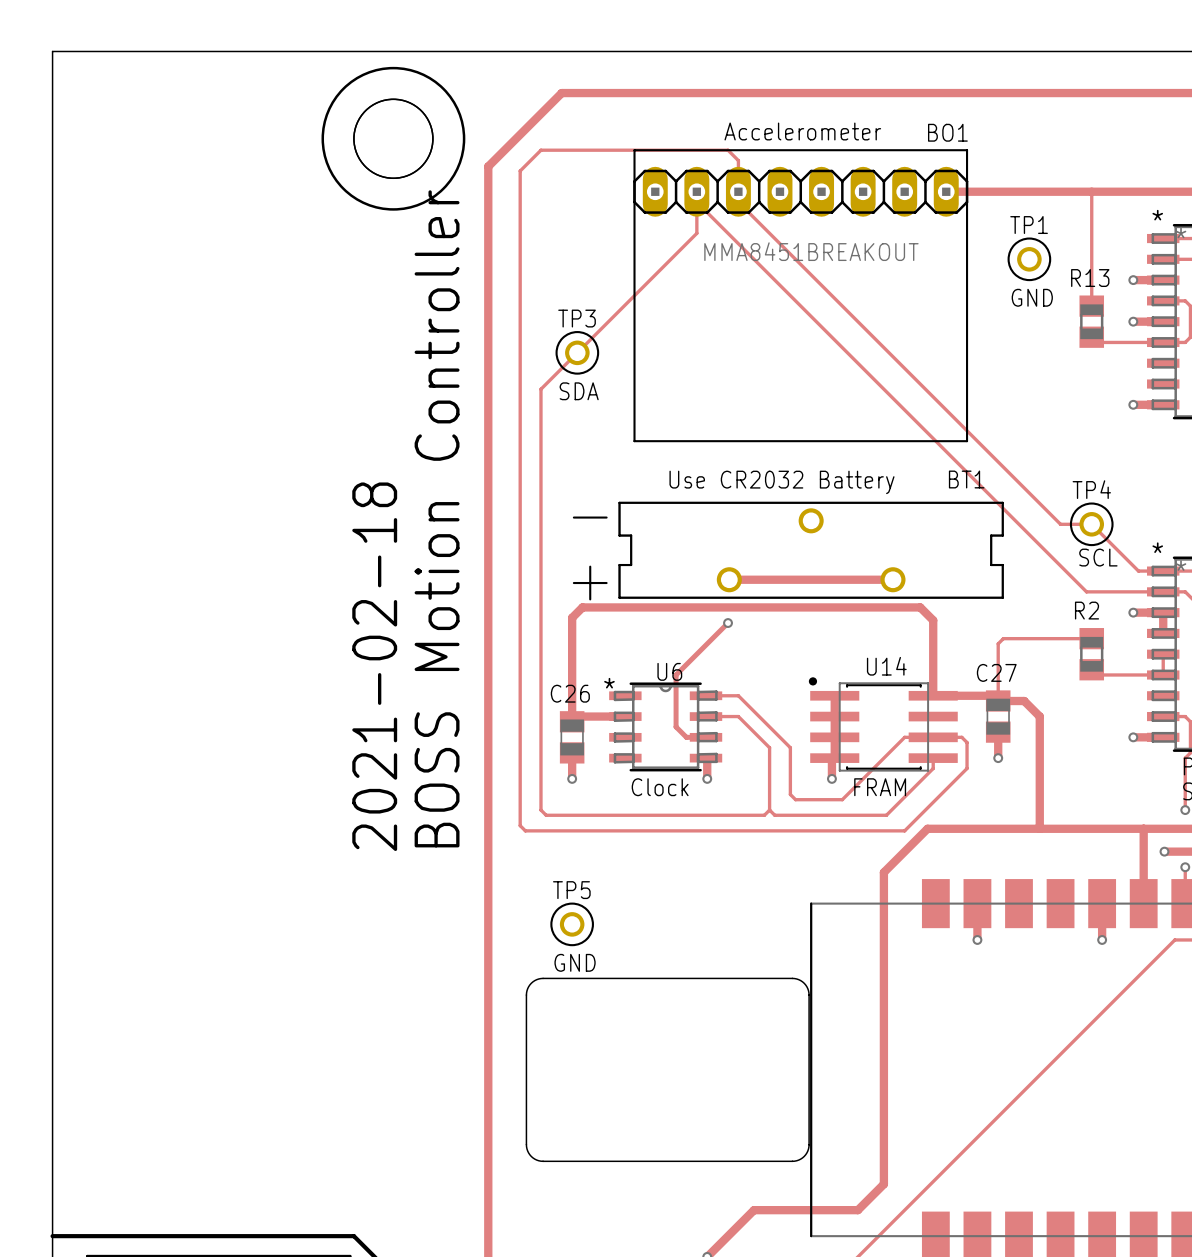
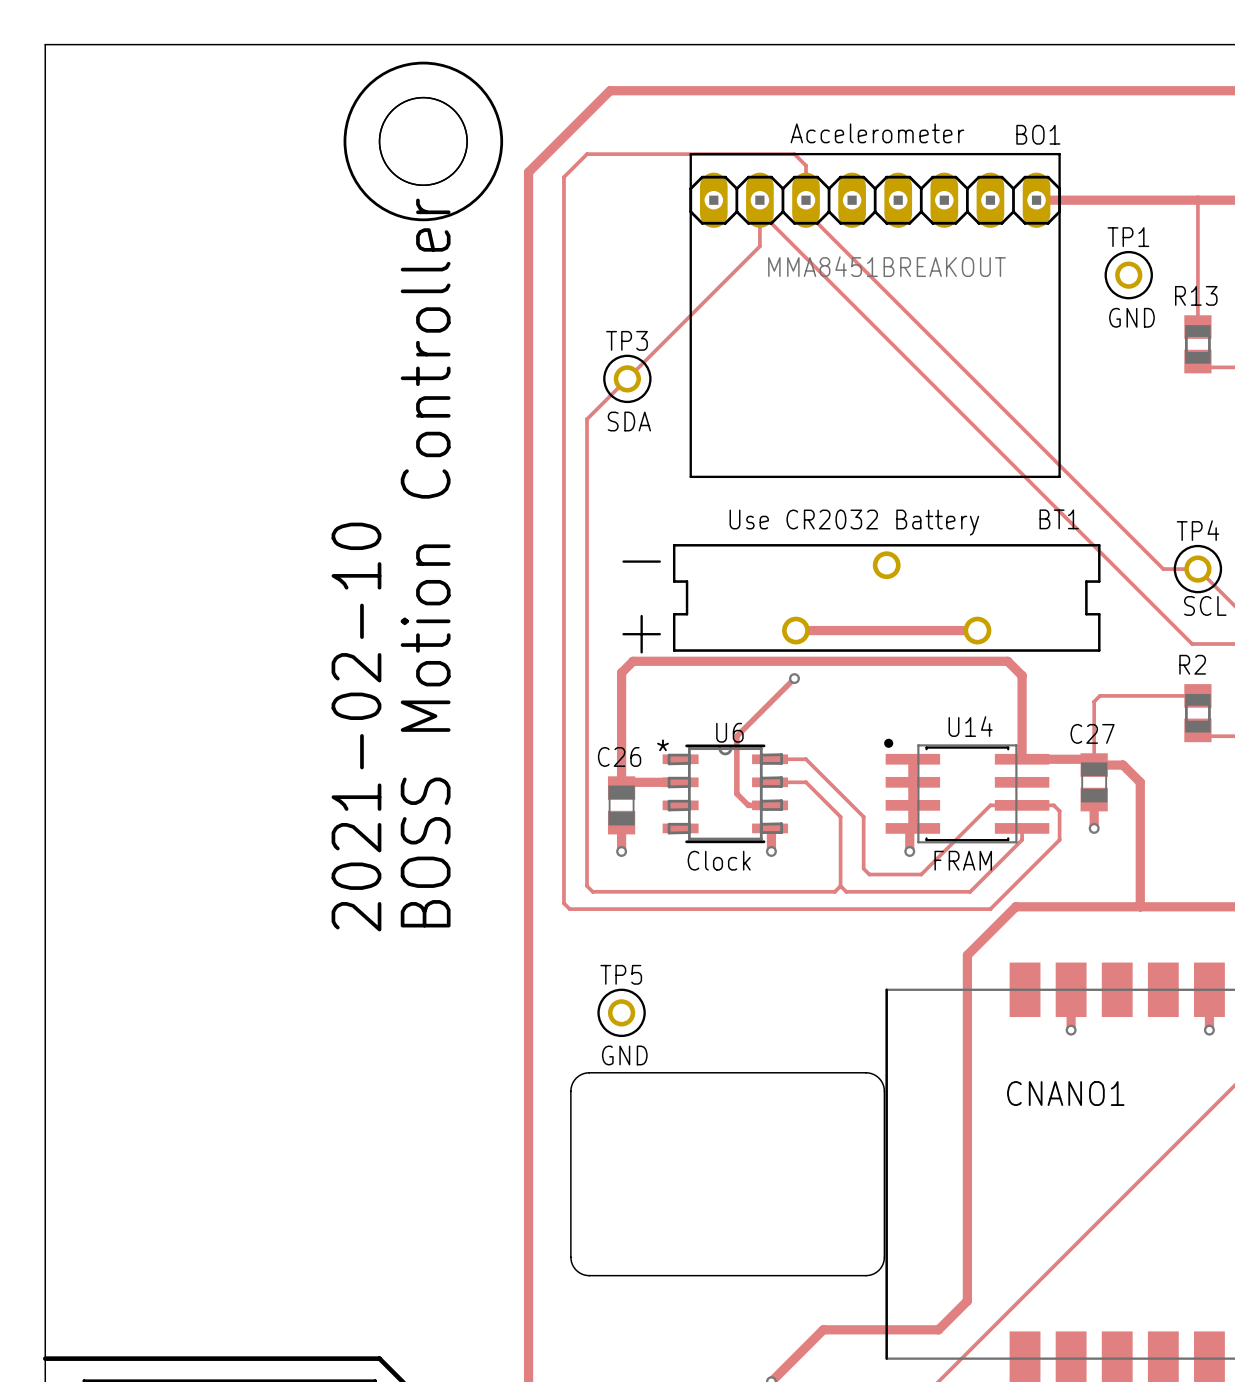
text position: BOSS Motion Controller (437, 518) -> BOSS Motion Controller (425, 563)
text: 2021-02-18 (374, 666) -> 2021-02-10 (356, 727)
CNANO1 name: none -> CNANO1 (1065, 1093)

